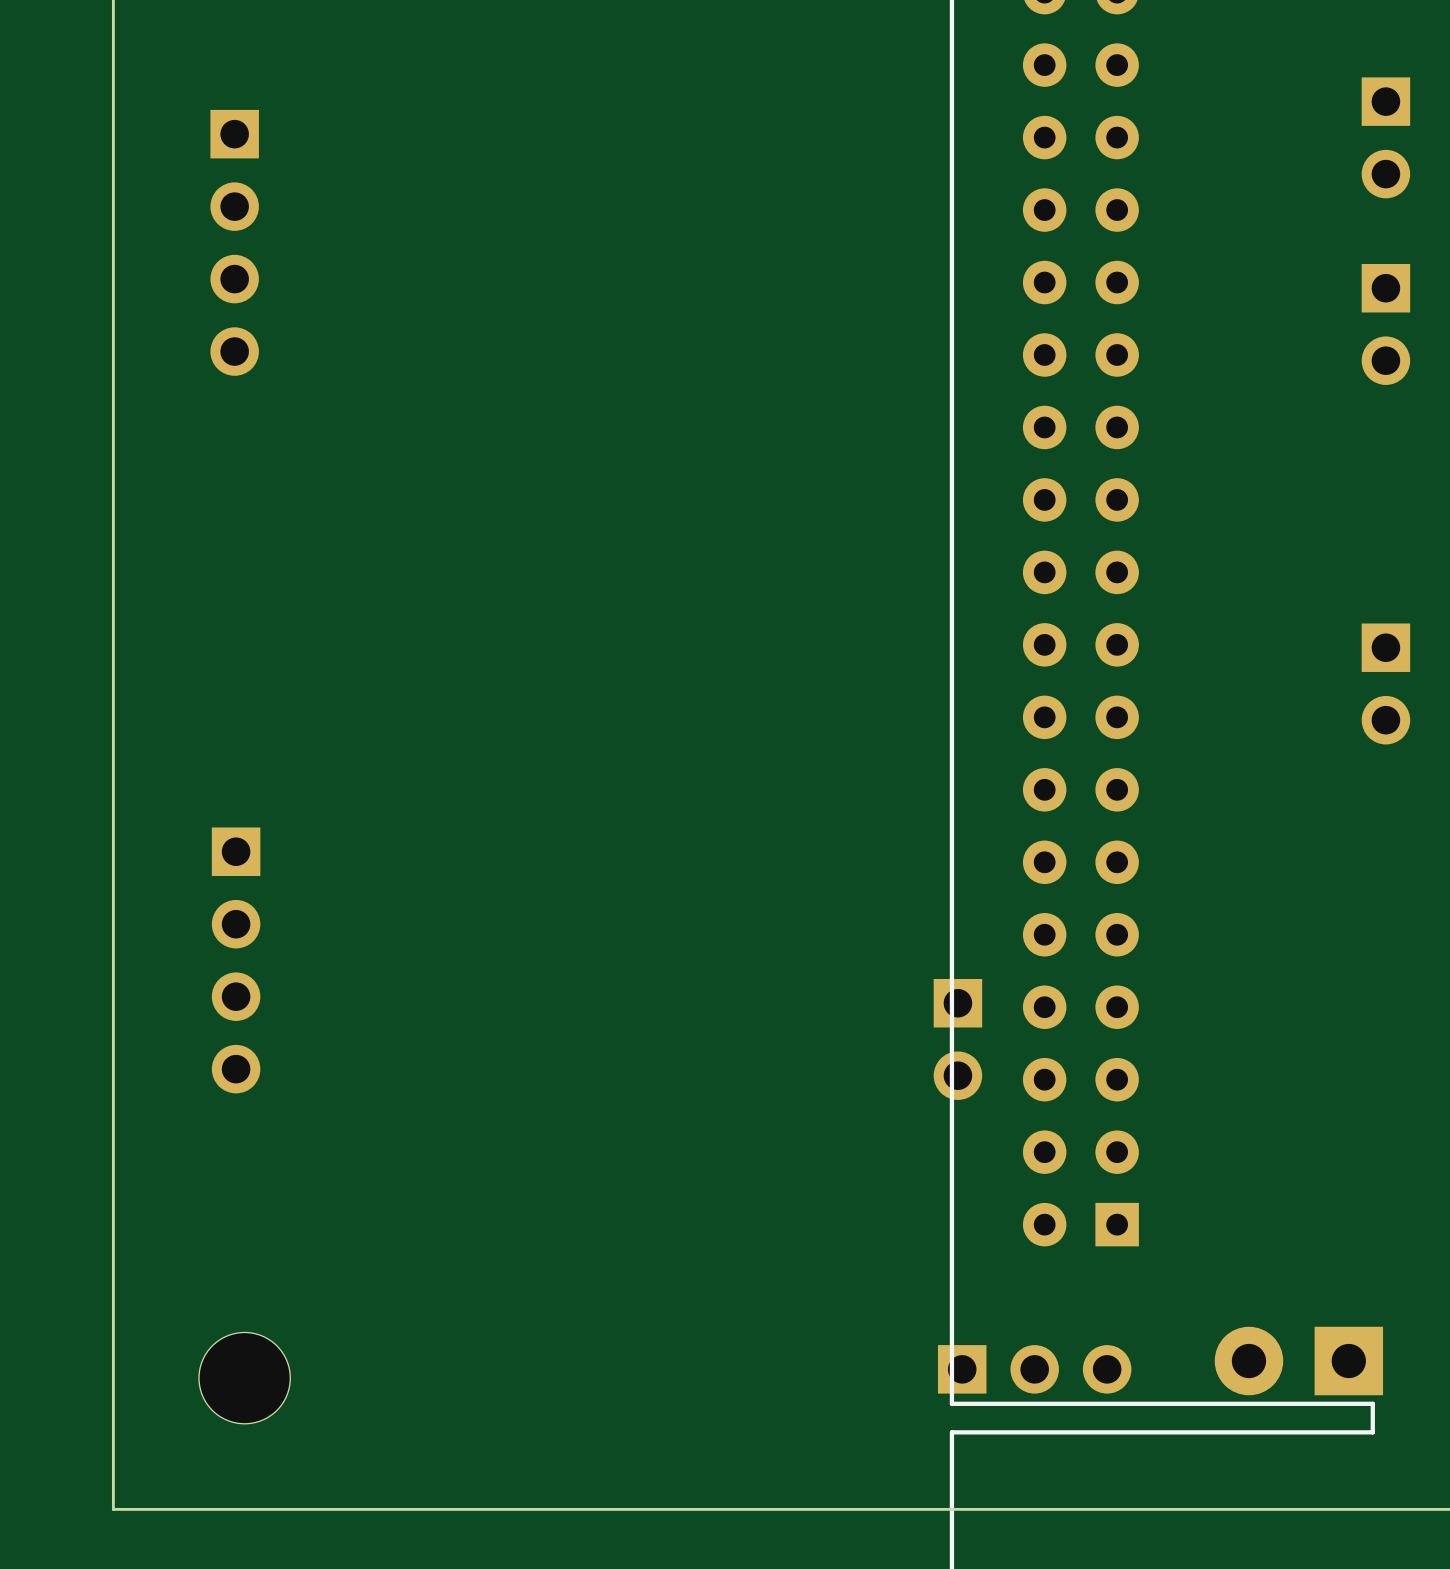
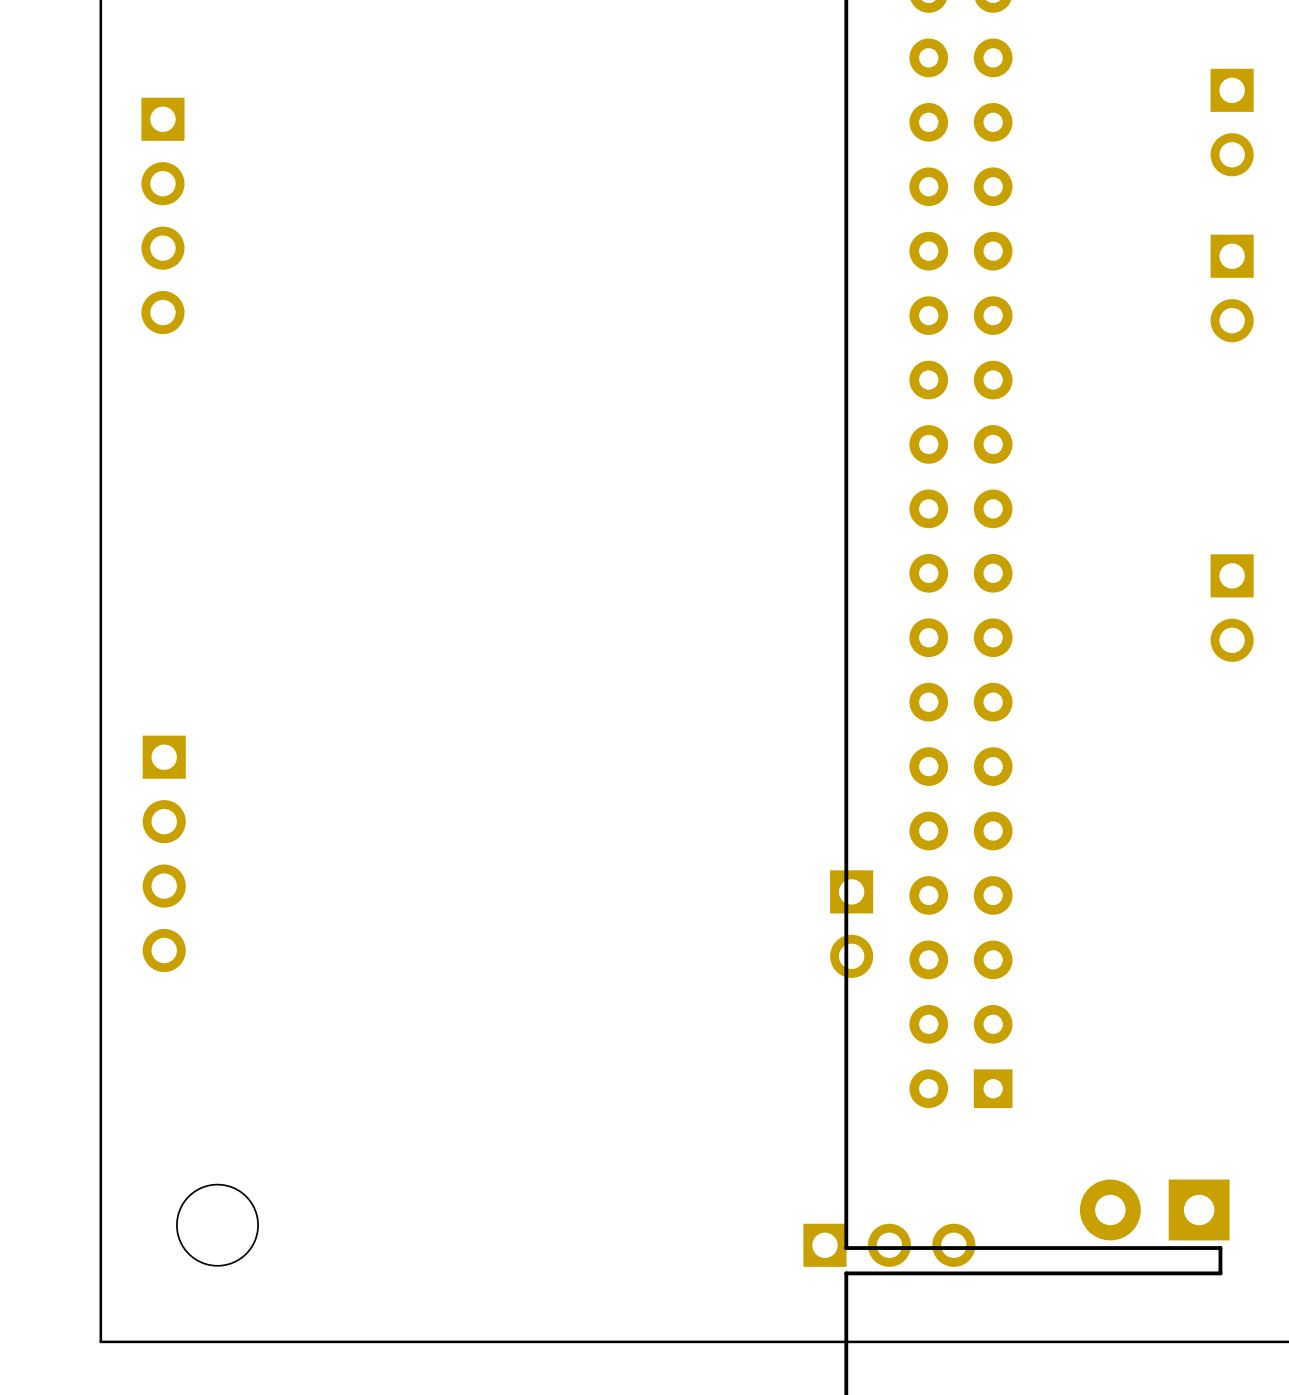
part position: (234, 242) -> (162, 215)
part position: (236, 960) -> (164, 853)
part position: (1034, 1369) -> (889, 1245)

